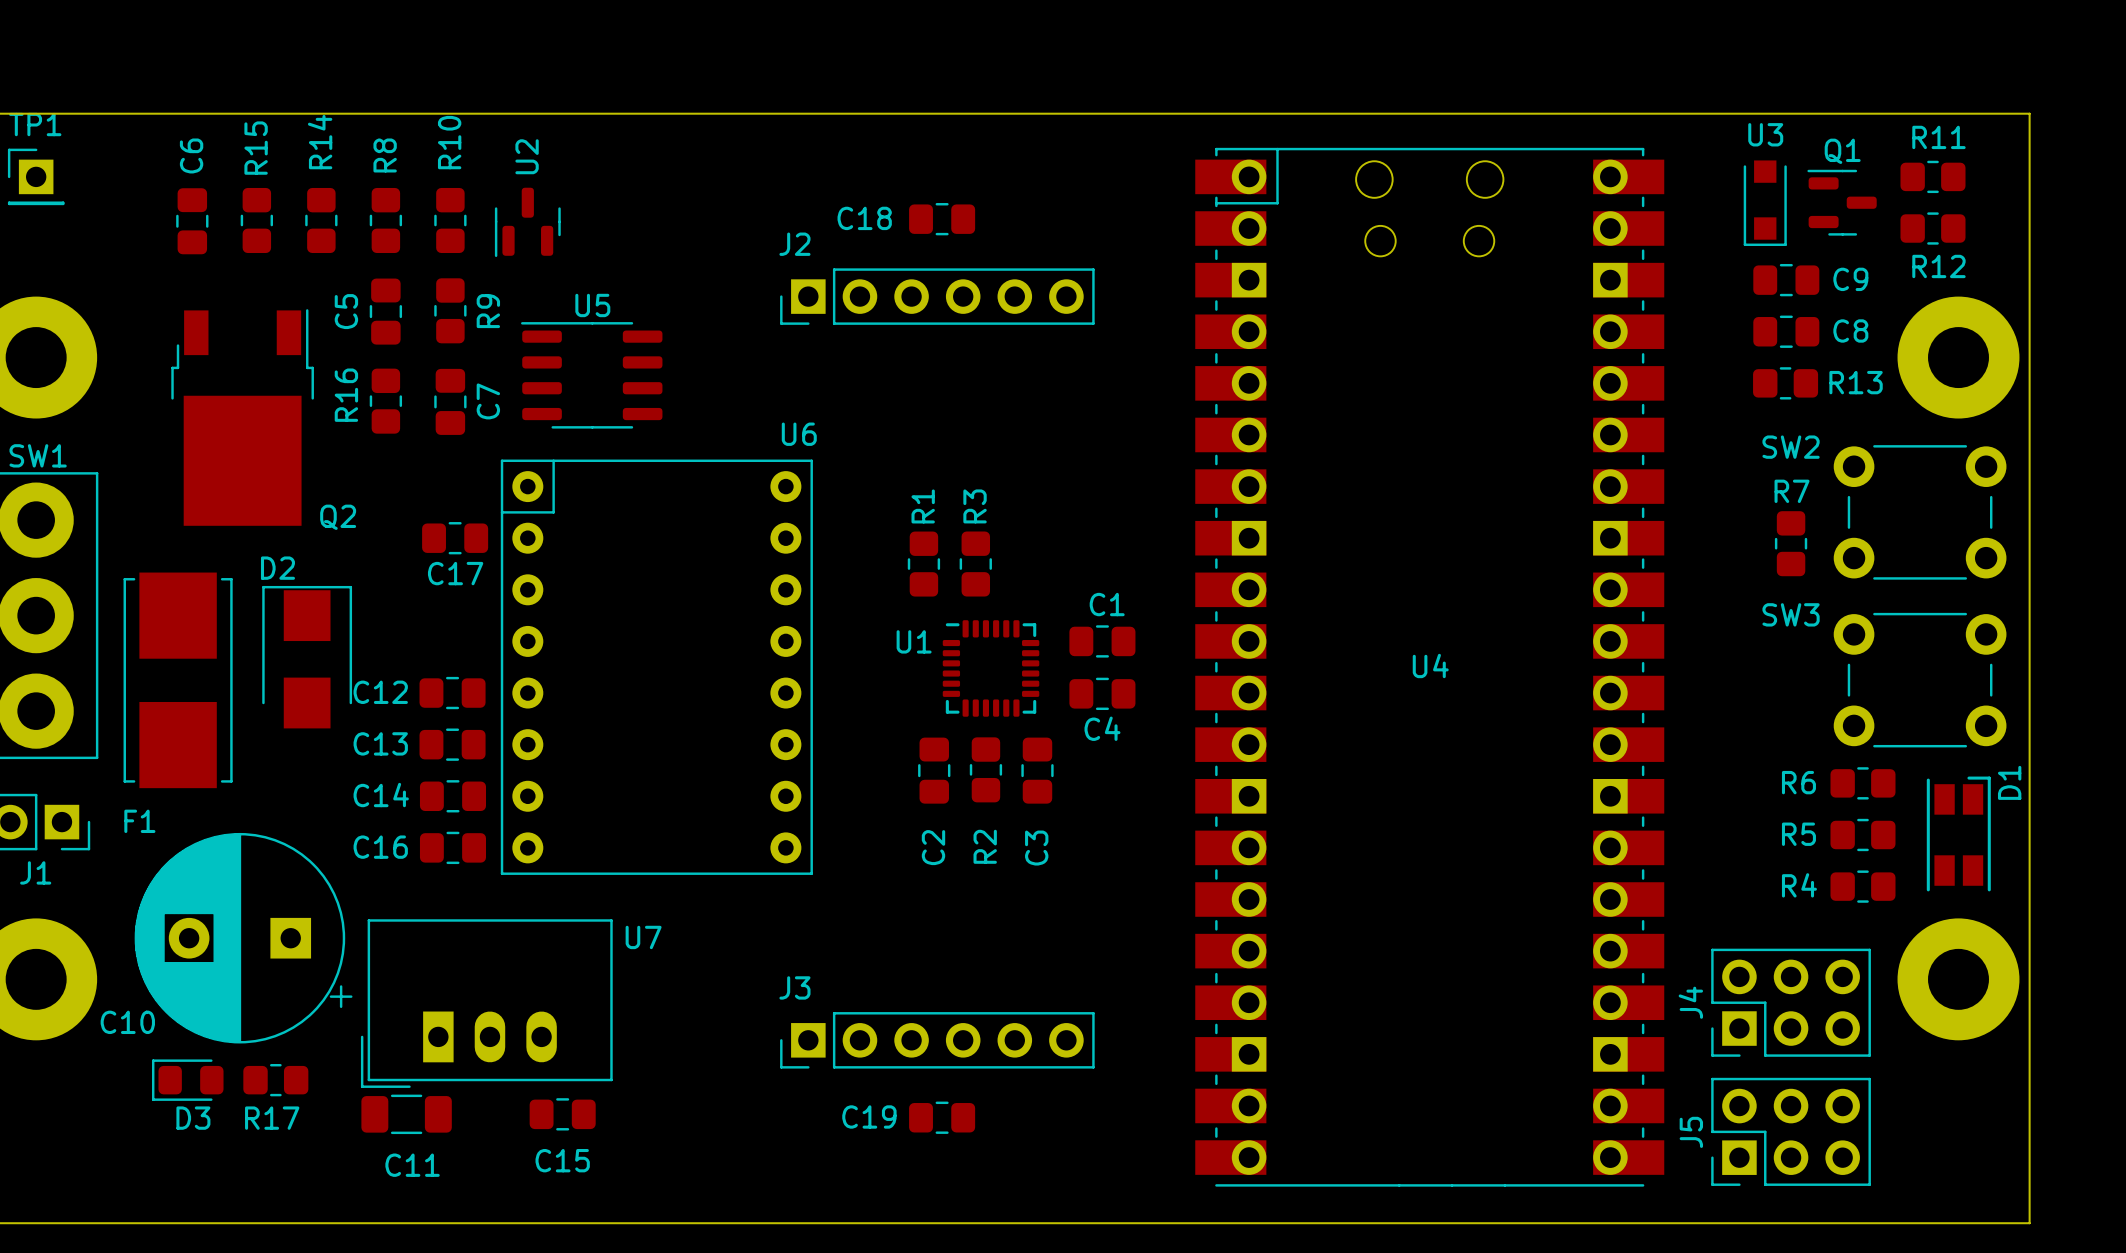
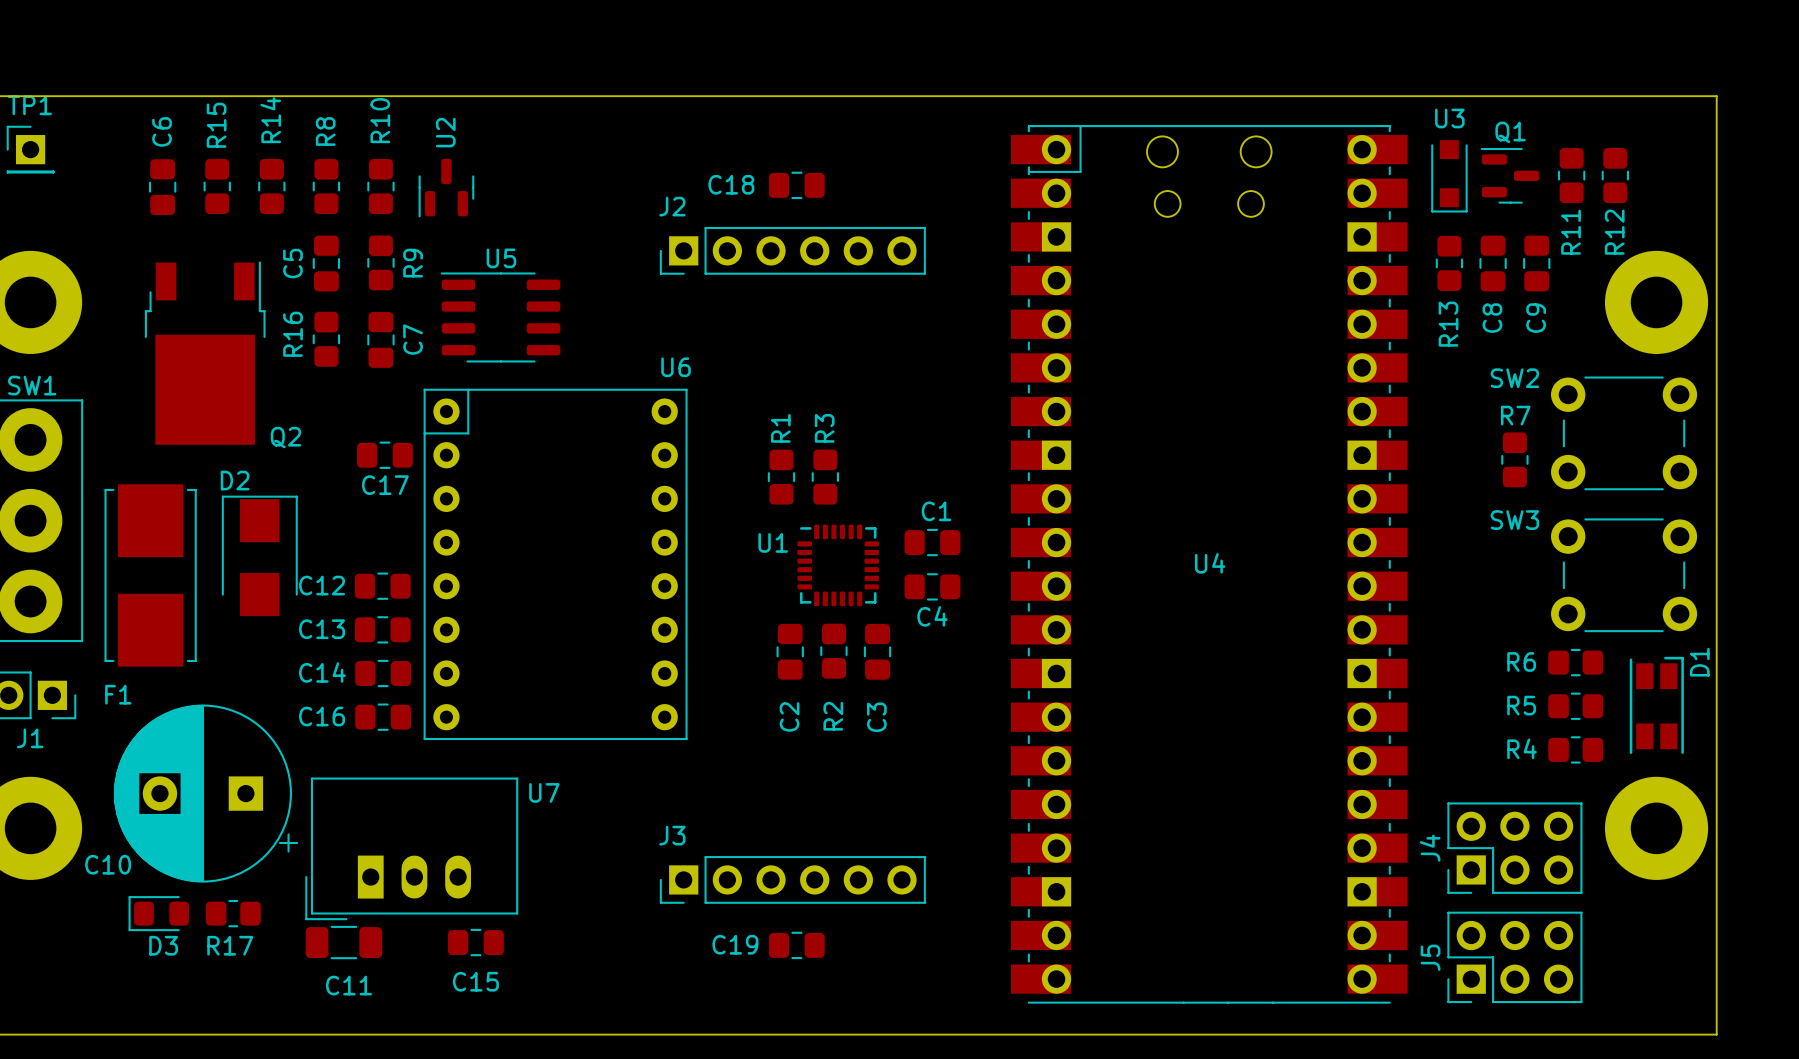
R11 name position: R11 (1938, 137) -> R11 (1571, 232)
R11 rotation: 0° (1932, 176) -> 90° clockwise (1571, 175)
R11 position: (1932, 176) -> (1571, 175)
Q1 position: (1842, 202) -> (1510, 175)
U3 position: (1765, 203) -> (1449, 176)
R12 rotation: 0° (1932, 228) -> 90° clockwise (1615, 175)
C9 rotation: 0° (1786, 280) -> 90° clockwise (1536, 263)
C9 position: (1786, 280) -> (1536, 263)
C8 rotation: 0° (1786, 331) -> 90° clockwise (1493, 263)
R13 rotation: 0° (1785, 383) -> 90° clockwise (1449, 263)
R13 position: (1785, 383) -> (1449, 263)

